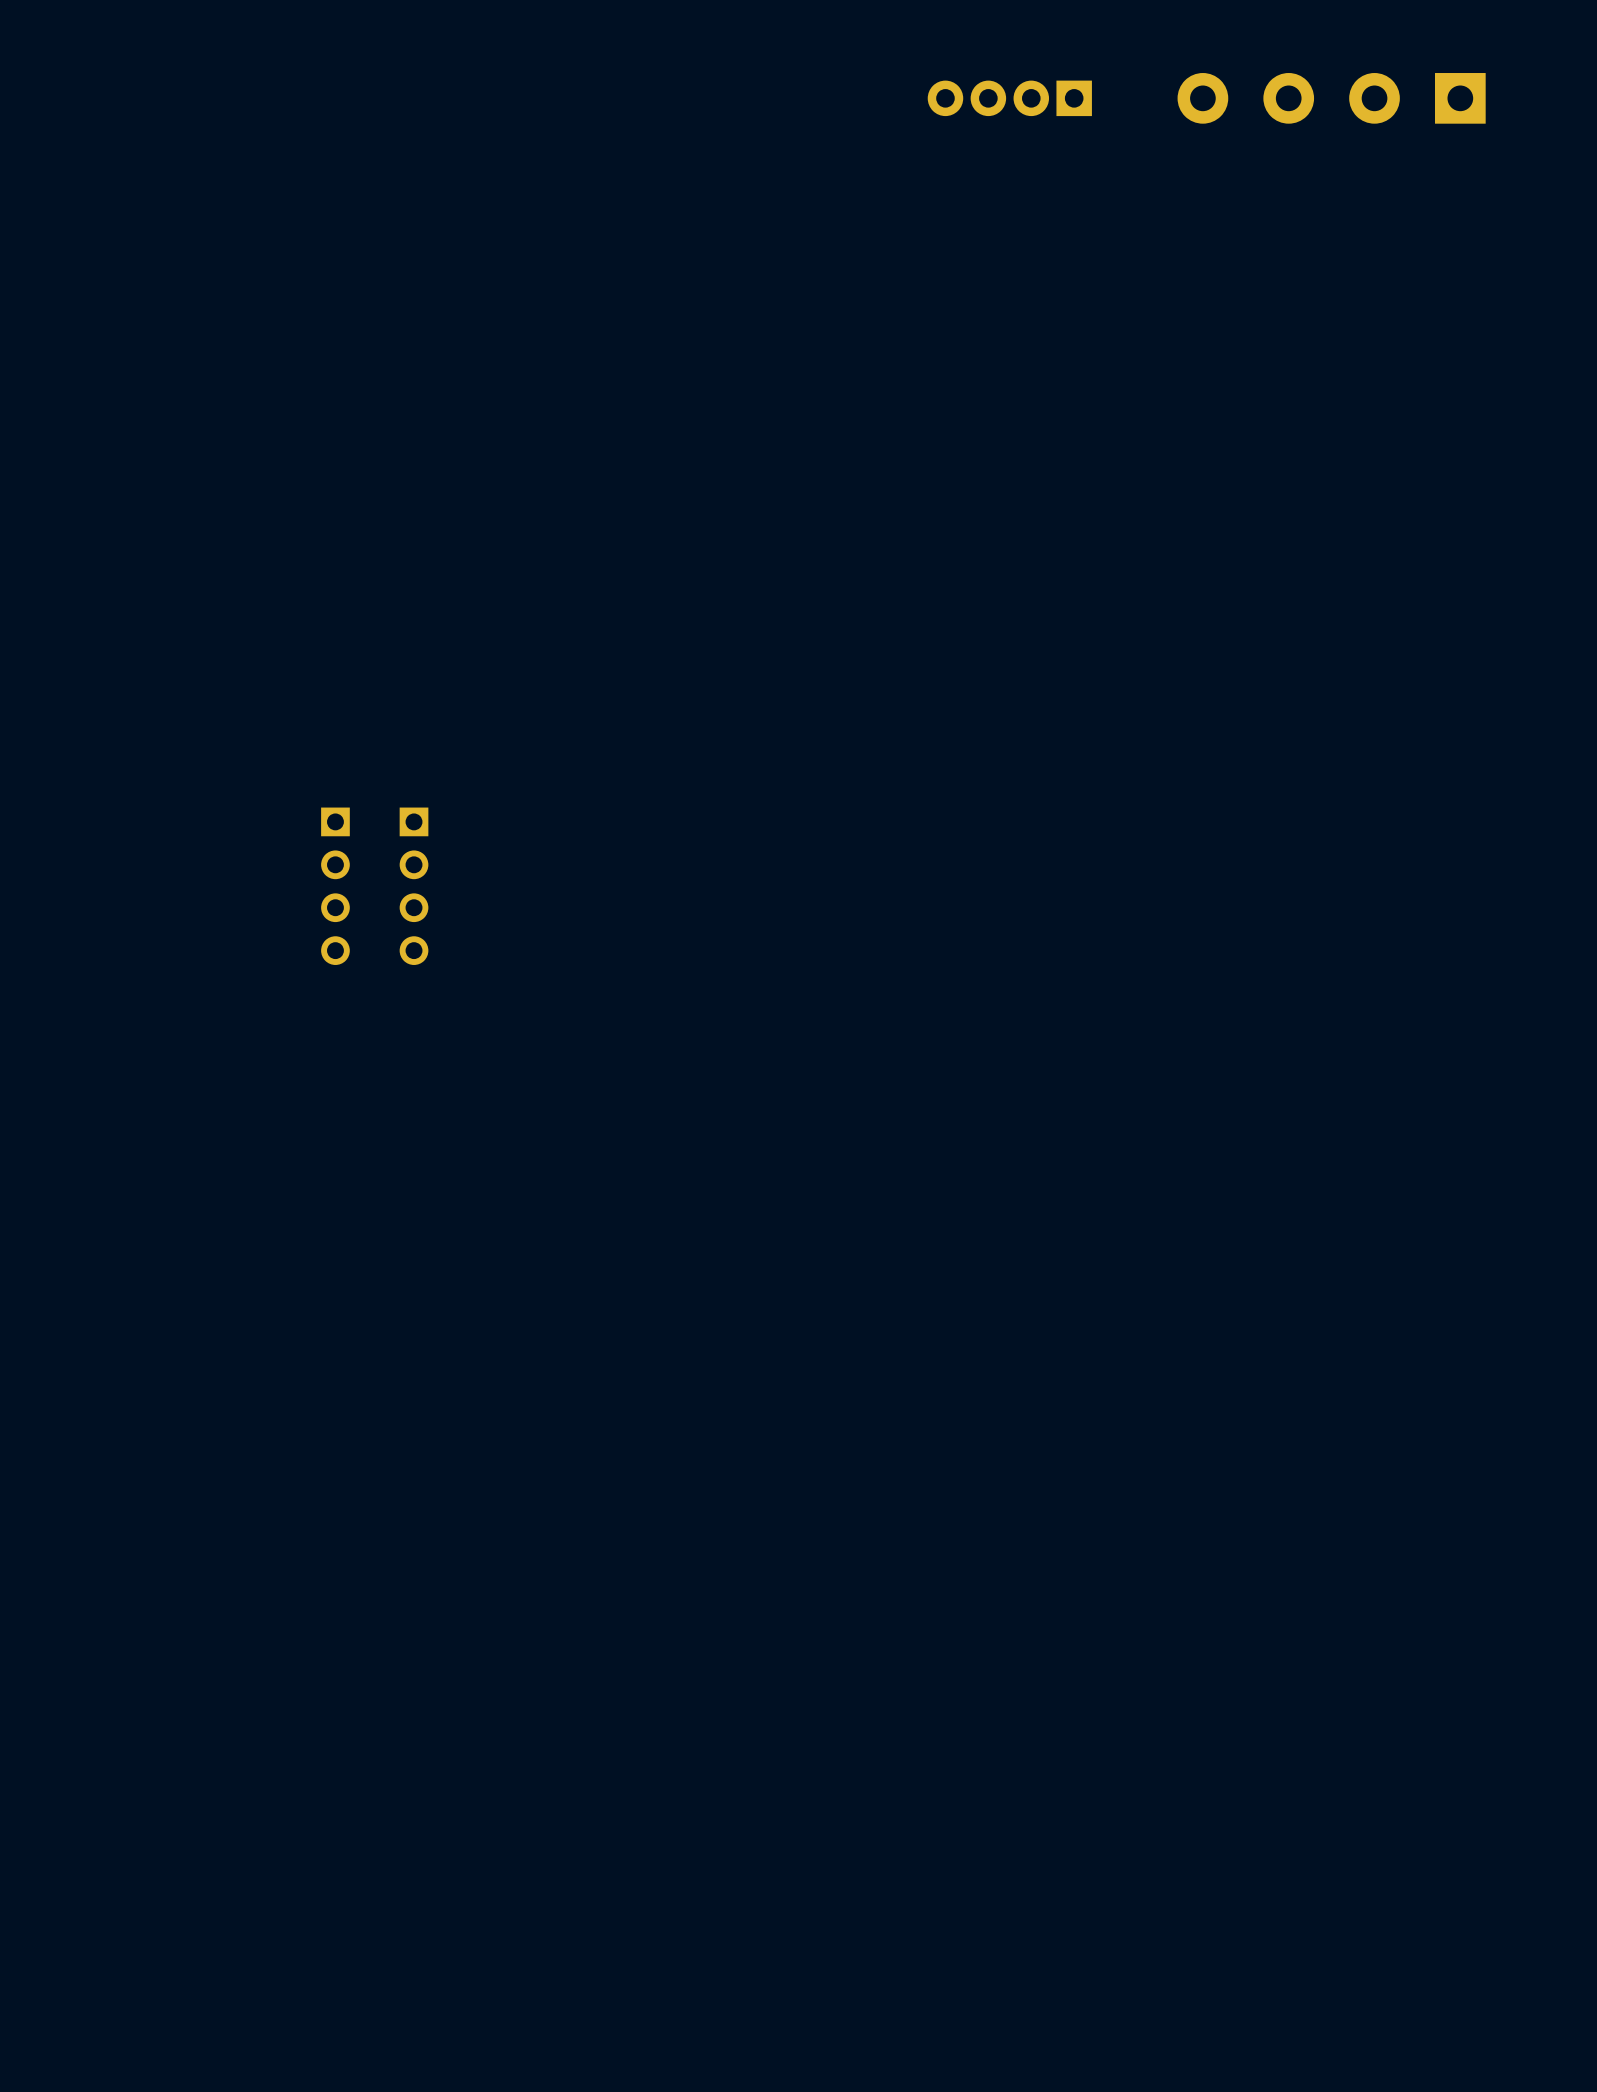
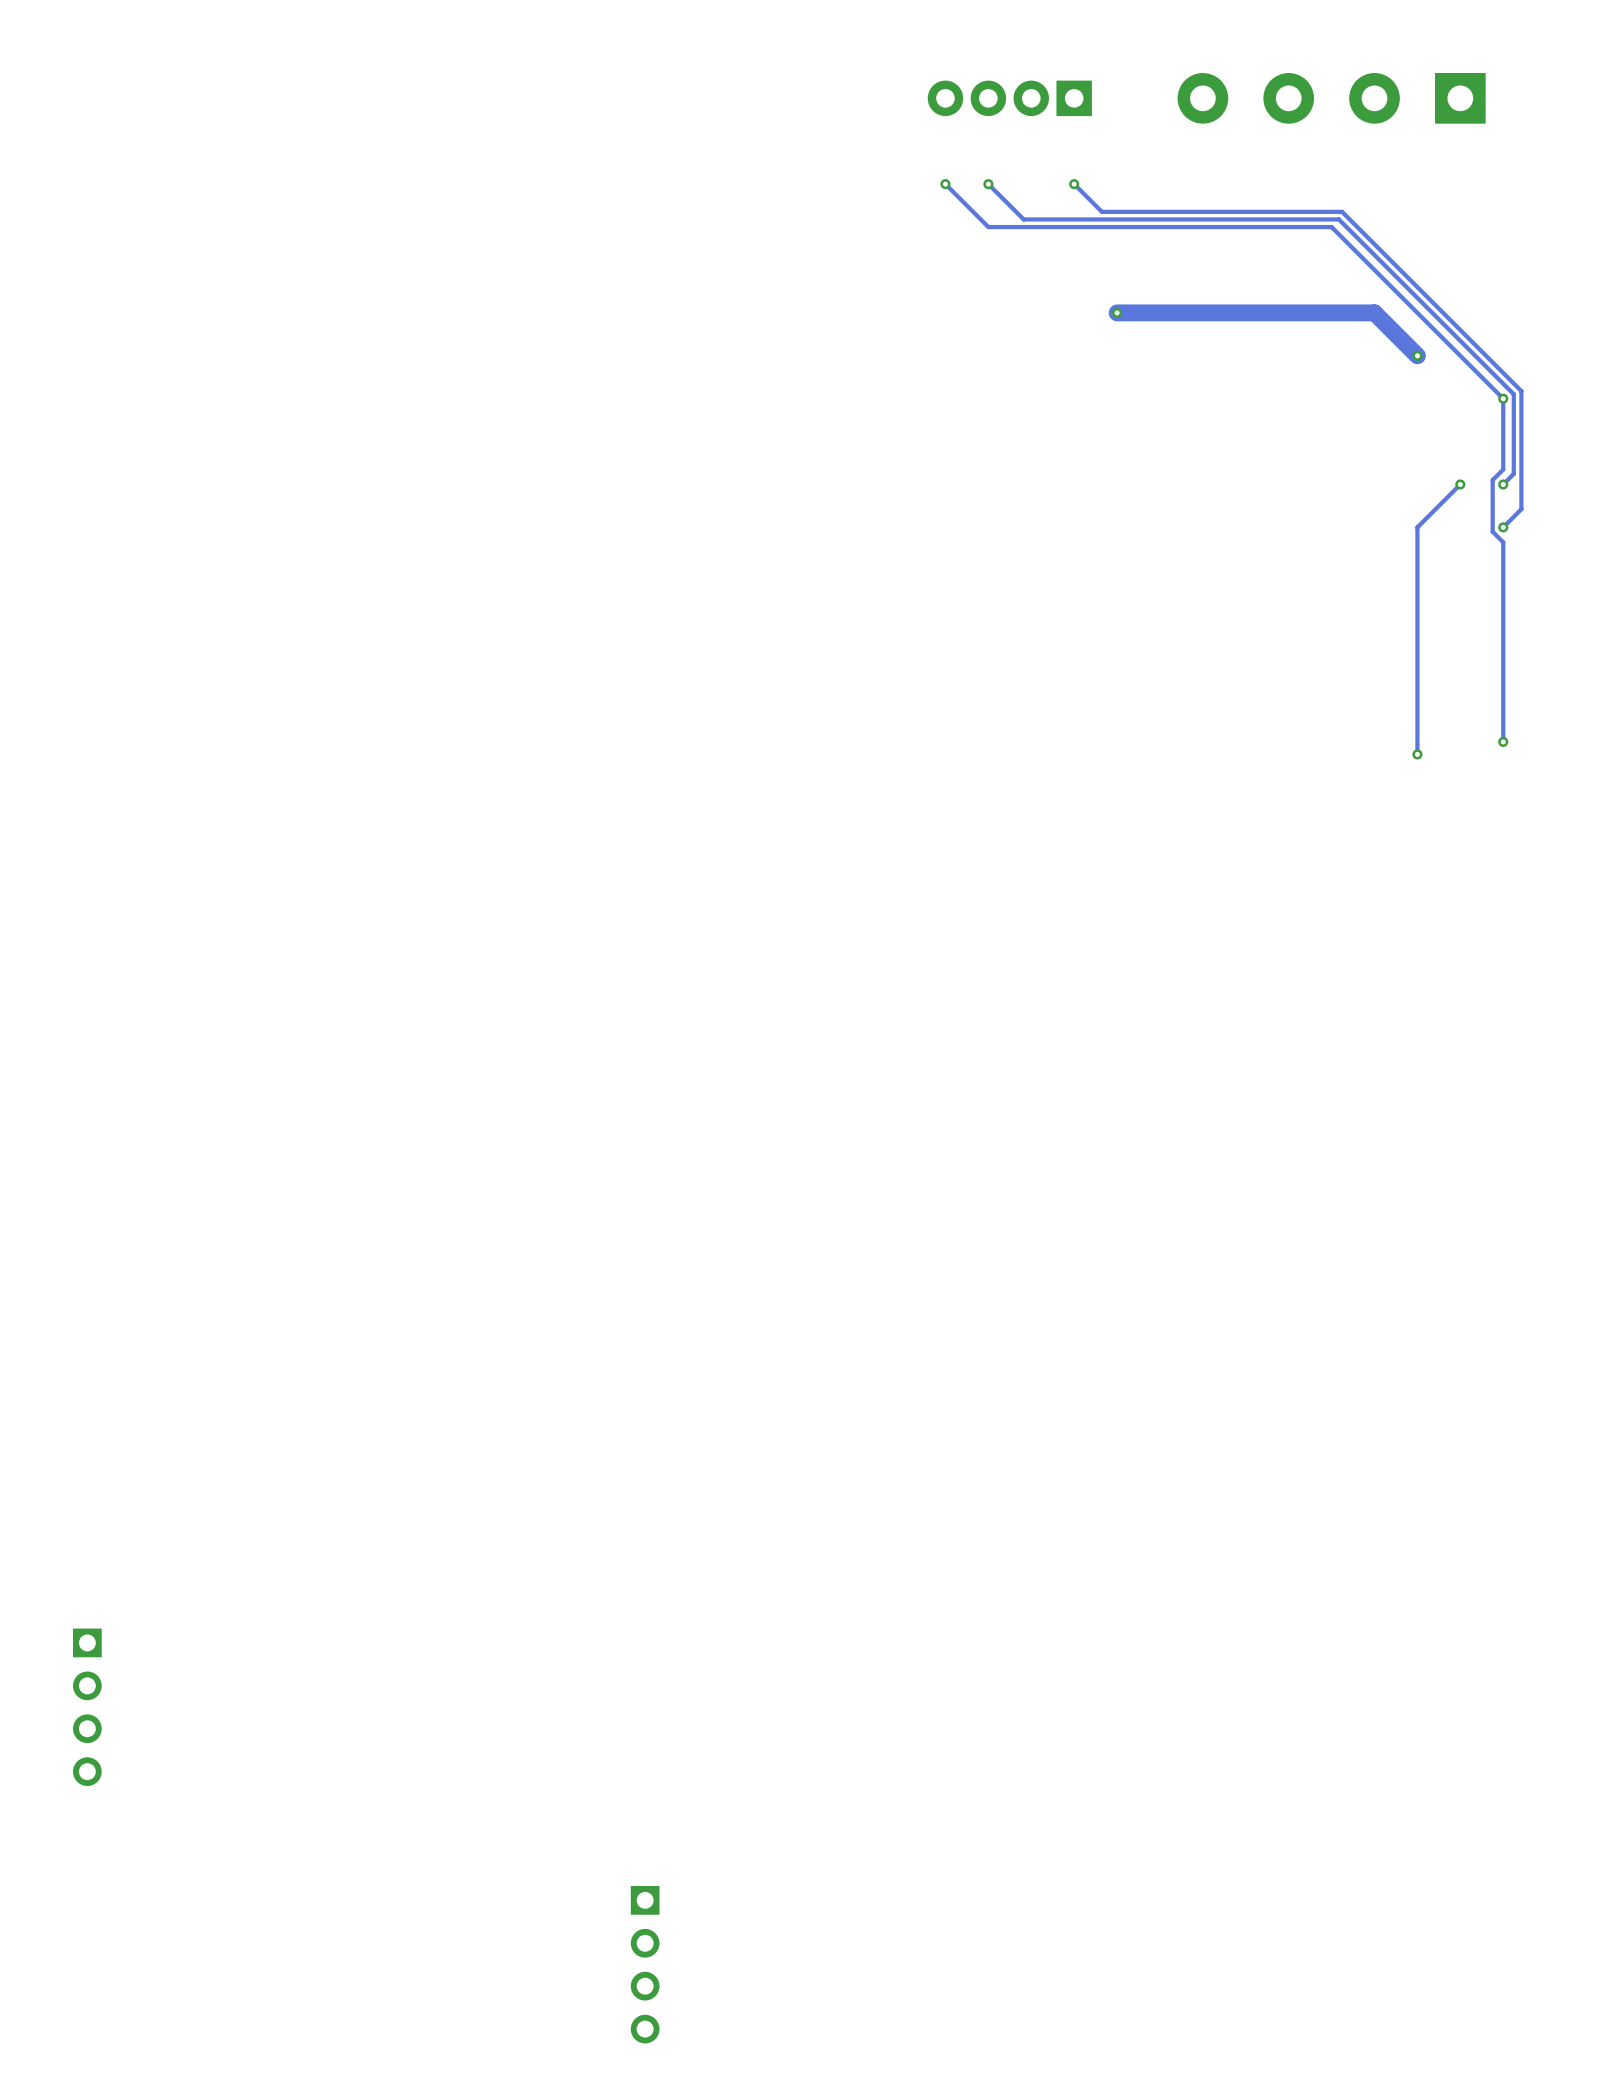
track: none -> (945, 184) (988, 227) (1331, 227) (1503, 398) (1503, 469) (1492, 480) (1492, 531) (1503, 542) (1503, 741)
via: none -> (945, 184)
track: none -> (988, 184) (1023, 219) (1338, 219) (1513, 394) (1513, 473) (1503, 484)
via: none -> (988, 184)
track: none -> (1074, 184) (1101, 211) (1342, 211) (1521, 391) (1521, 509) (1503, 527)
via: none -> (1074, 184)
track: none -> (1117, 312) (1374, 312) (1417, 355)
via: none -> (1117, 312)
via: none -> (1417, 355)
via: none -> (1503, 398)
track: none -> (1460, 484) (1417, 527) (1417, 754)
via: none -> (1460, 484)
via: none -> (1503, 484)
via: none -> (1503, 527)
via: none -> (1503, 741)
via: none -> (1417, 754)
part: (335, 886) -> none
part: (414, 886) -> none
part: none -> (87, 1707)
part: none -> (645, 1964)

